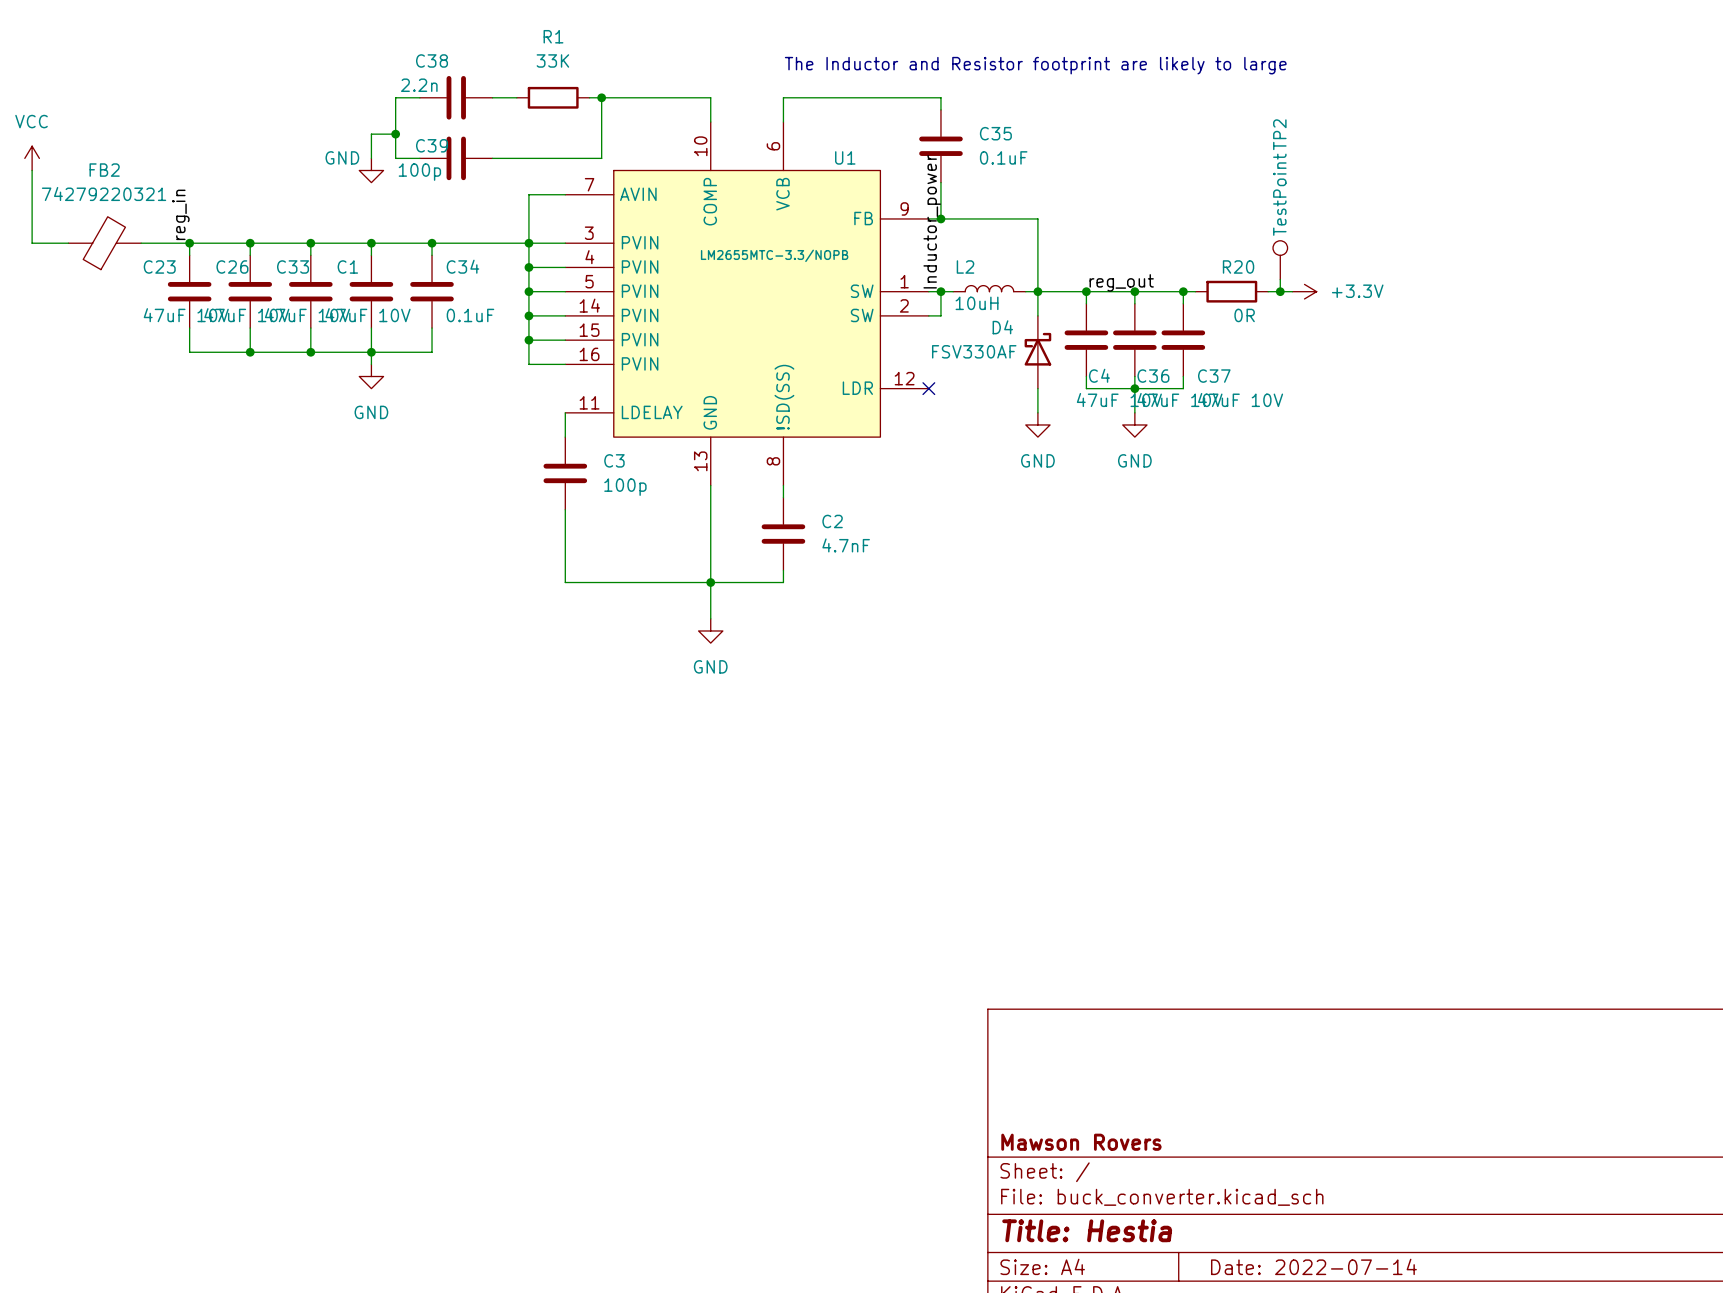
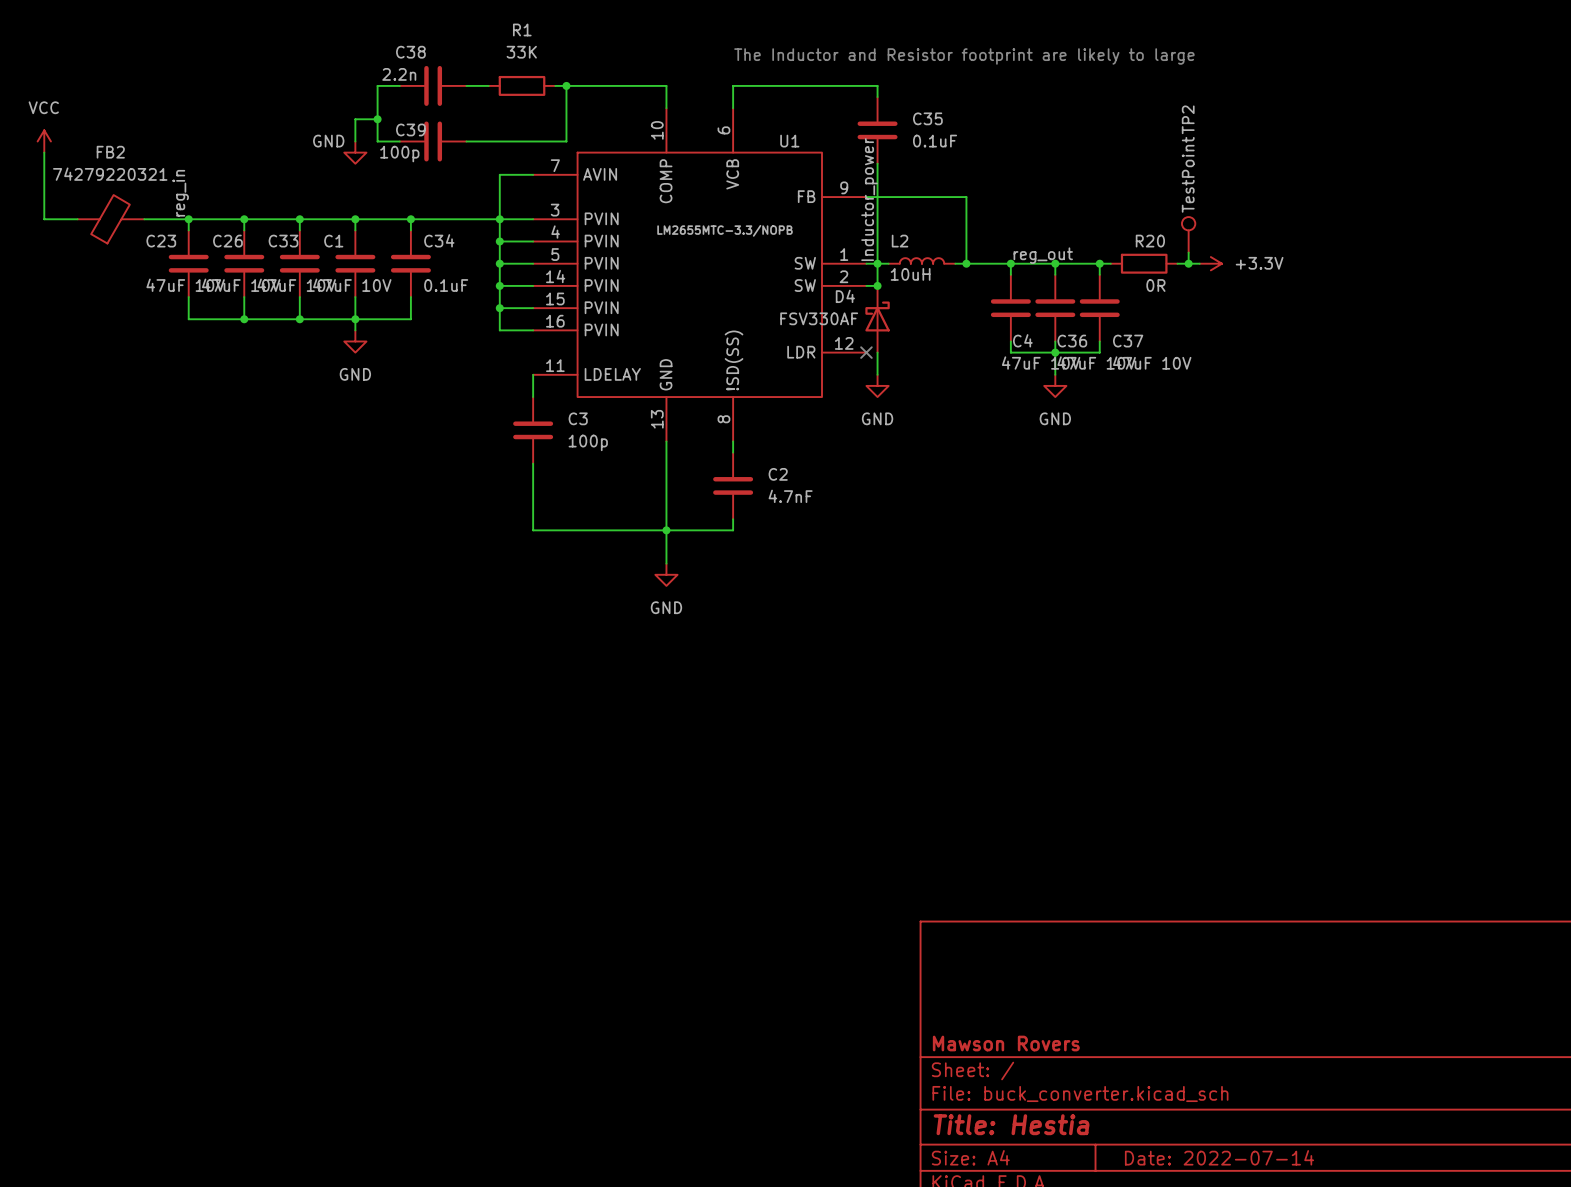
wire: none -> (877, 197) (877, 263)
junction: (940, 218) -> none
wire: (1037, 291) (1037, 315) -> none
junction: none -> (877, 285)
D4 position: (1037, 352) -> (877, 319)
wire: (1037, 388) (1037, 412) -> (877, 352) (877, 374)
power symbol position: GND (1037, 424) -> GND (877, 385)

